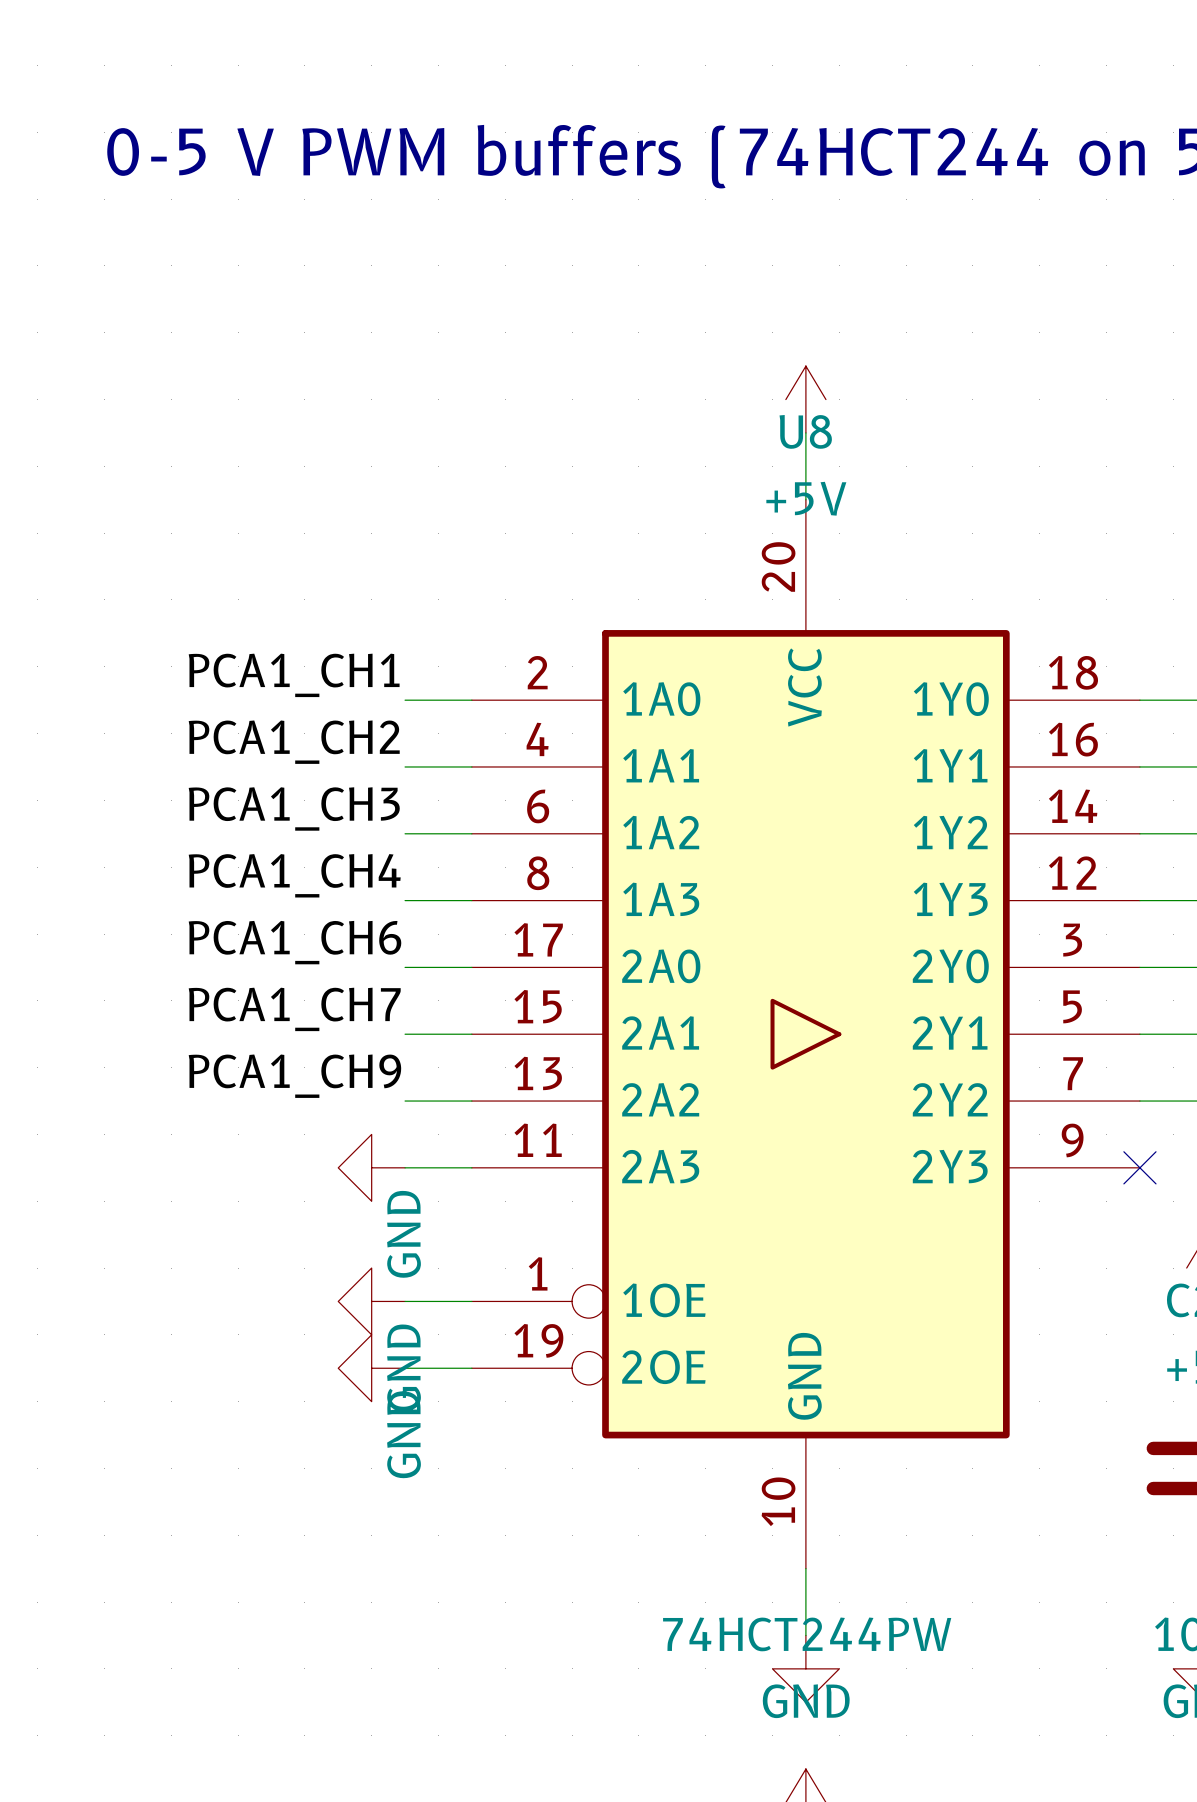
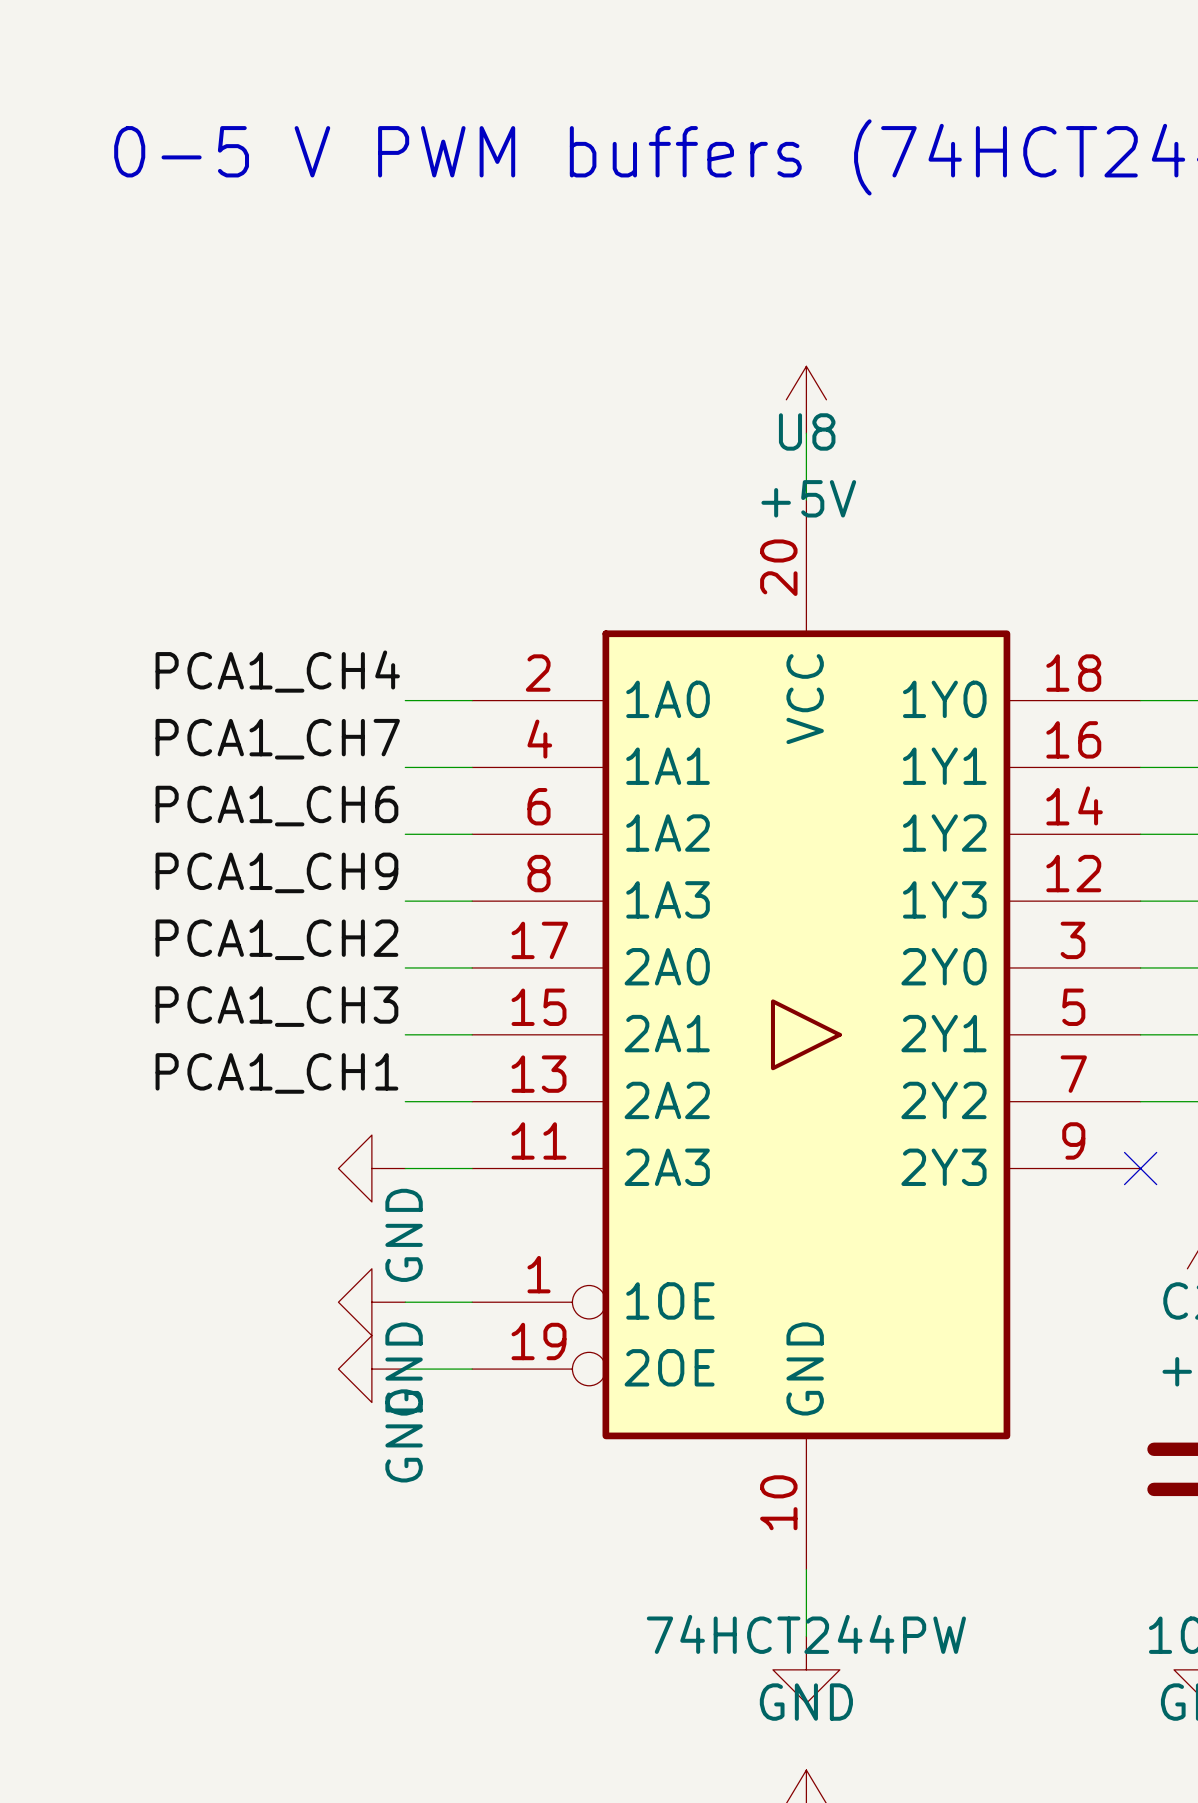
label: PCA1_CH1 (294, 675) -> PCA1_CH4 (277, 671)
label: PCA1_CH2 (294, 742) -> PCA1_CH7 (277, 739)
label: PCA1_CH3 (294, 808) -> PCA1_CH6 (276, 806)
label: PCA1_CH4 (294, 875) -> PCA1_CH9 (276, 872)
label: PCA1_CH6 (294, 942) -> PCA1_CH2 (276, 939)
label: PCA1_CH7 (294, 1009) -> PCA1_CH3 (276, 1006)
label: PCA1_CH9 (294, 1076) -> PCA1_CH1 (276, 1073)

